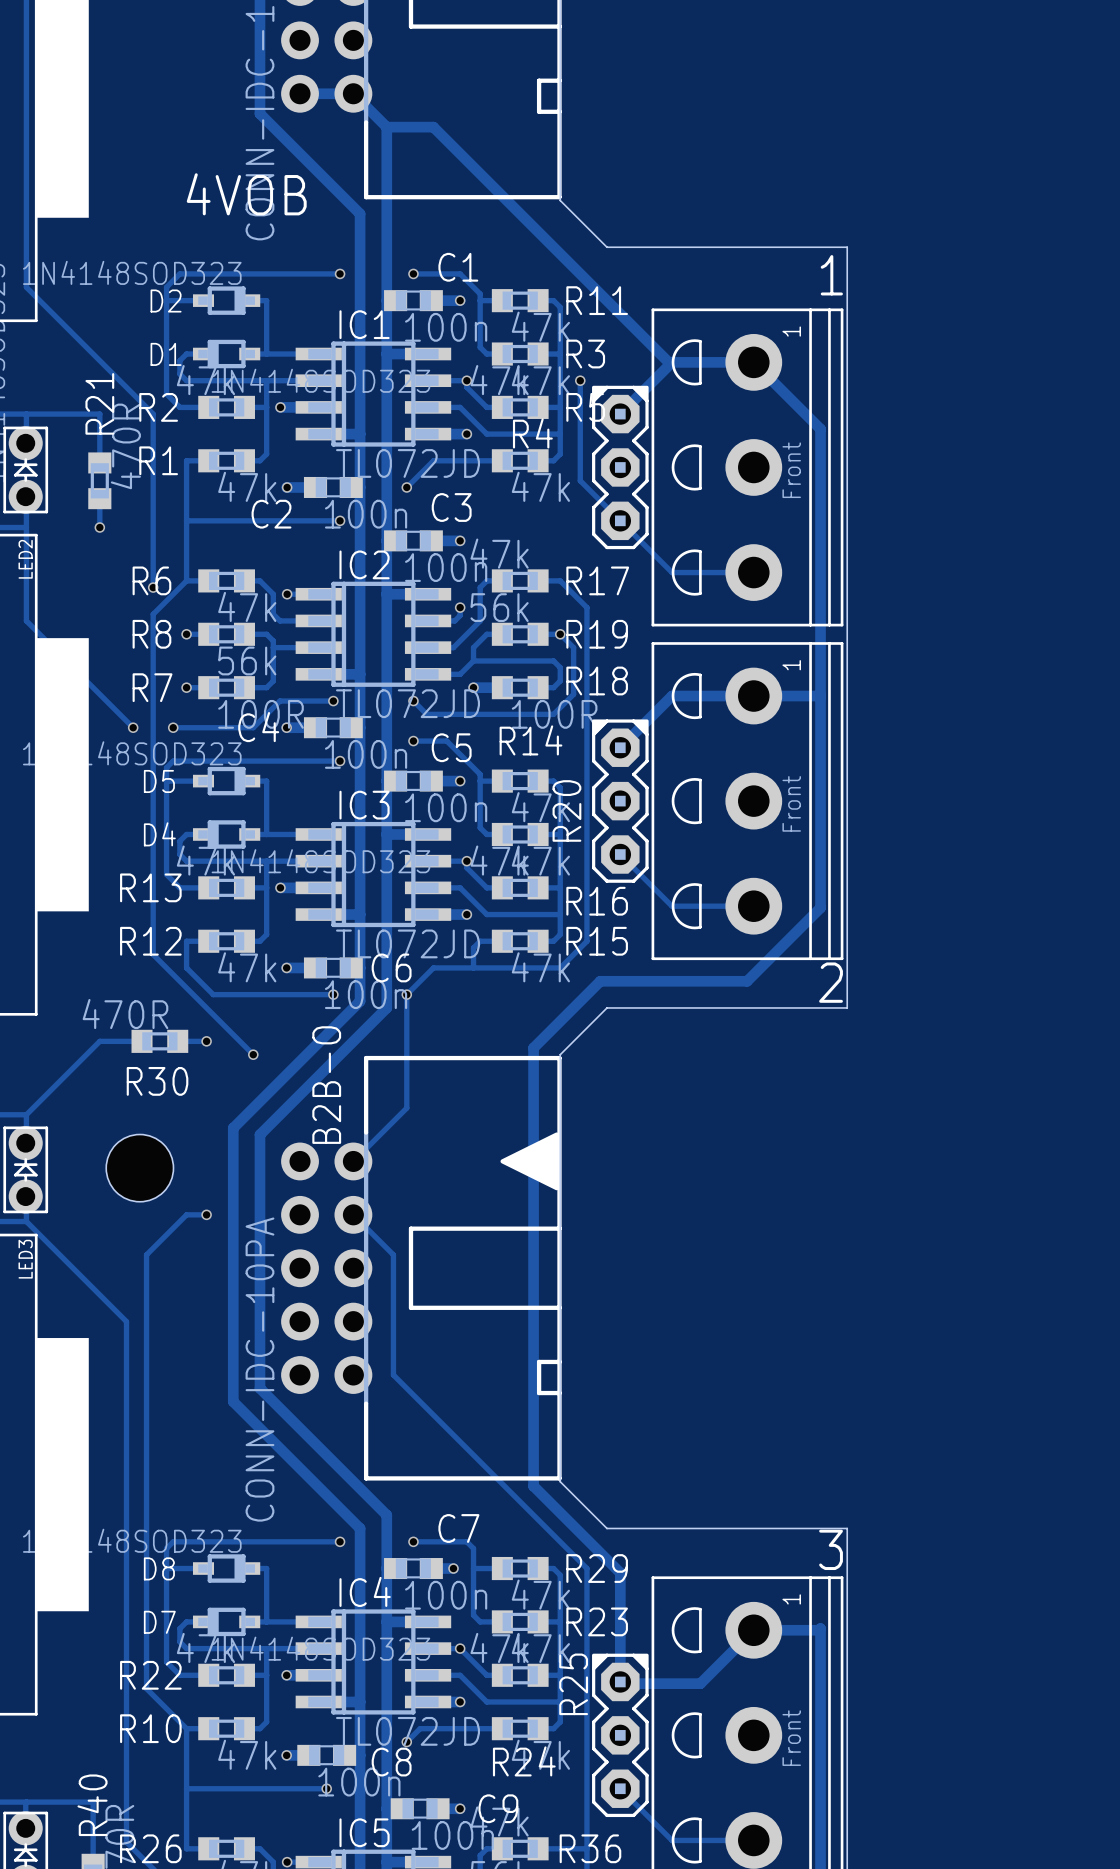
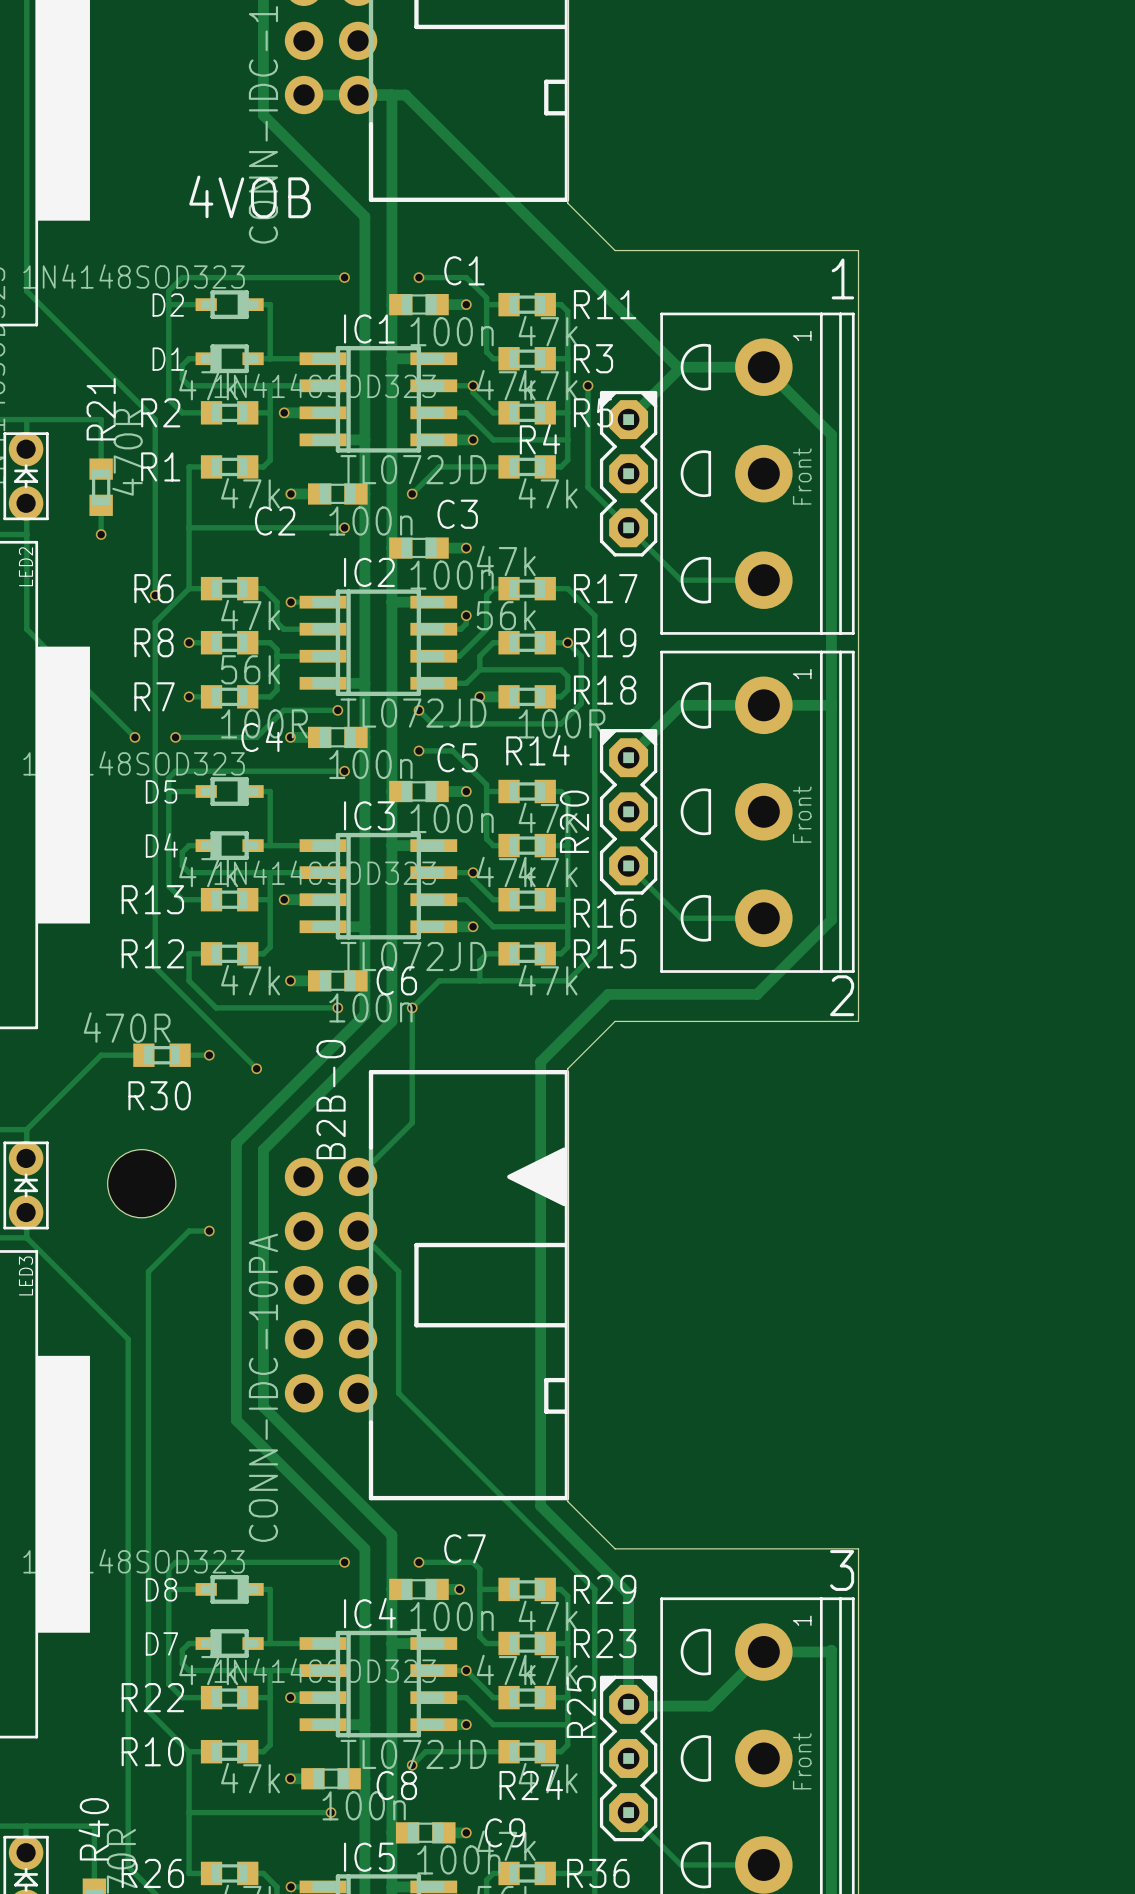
track: (353, 93) (386, 127) (433, 127) -> (358, 95) (405, 95) (439, 128)
track: none -> (391, 95) (391, 128)

